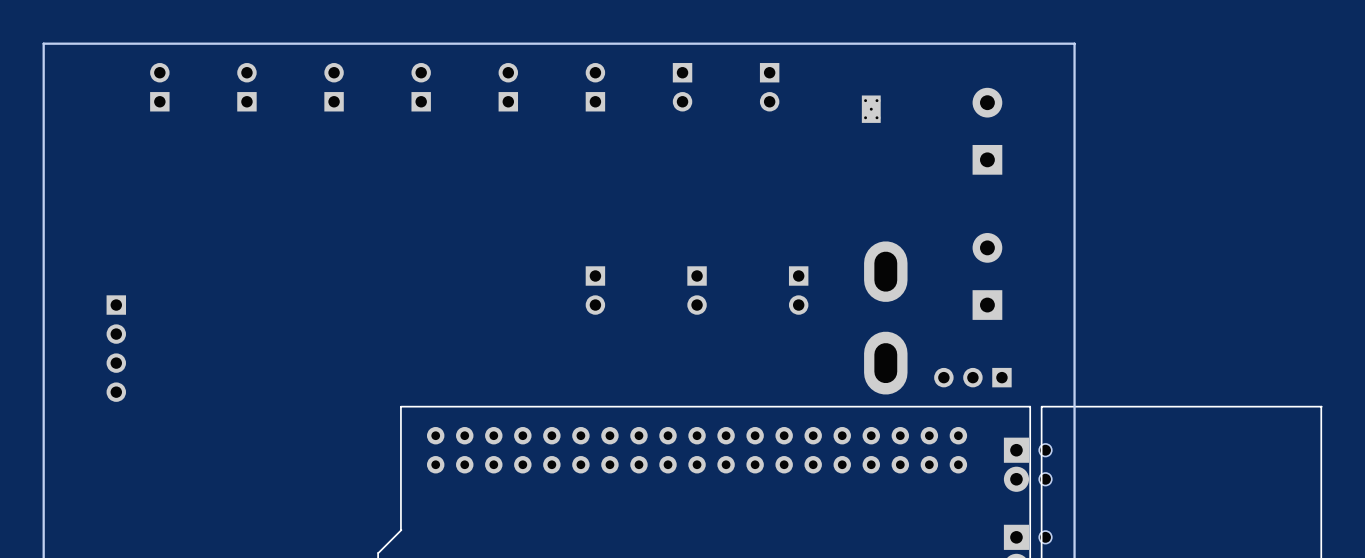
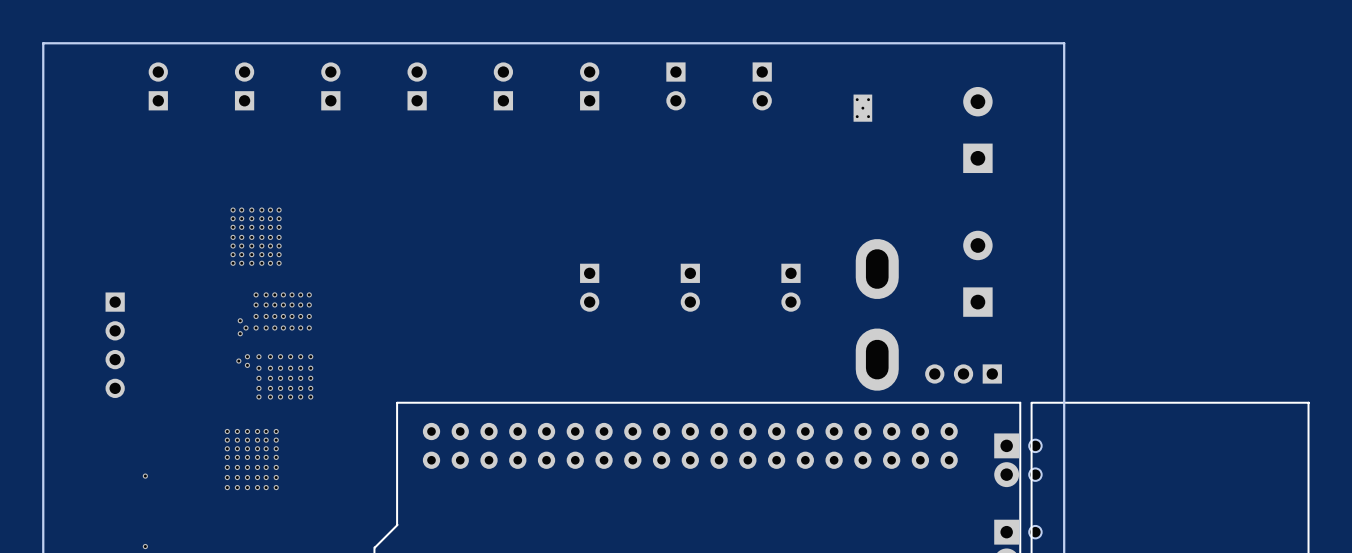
via: none -> (233, 210)
via: none -> (241, 210)
via: none -> (251, 210)
via: none -> (261, 210)
via: none -> (270, 210)
via: none -> (279, 210)
via: none -> (233, 218)
via: none -> (241, 218)
via: none -> (251, 218)
via: none -> (261, 218)
via: none -> (270, 218)
via: none -> (279, 218)
via: none -> (233, 227)
via: none -> (241, 227)
via: none -> (251, 227)
via: none -> (261, 227)
via: none -> (270, 227)
via: none -> (279, 227)
via: none -> (233, 237)
via: none -> (241, 237)
via: none -> (251, 237)
via: none -> (261, 237)
via: none -> (270, 237)
via: none -> (279, 237)
via: none -> (233, 246)
via: none -> (241, 246)
via: none -> (251, 246)
via: none -> (261, 246)
via: none -> (270, 246)
via: none -> (279, 246)
via: none -> (233, 254)
via: none -> (241, 254)
via: none -> (251, 254)
via: none -> (261, 254)
via: none -> (270, 254)
via: none -> (279, 254)
via: none -> (233, 263)
via: none -> (241, 263)
via: none -> (251, 263)
via: none -> (261, 263)
via: none -> (270, 263)
via: none -> (279, 263)
via: none -> (256, 294)
via: none -> (266, 294)
via: none -> (274, 294)
via: none -> (283, 294)
via: none -> (292, 294)
via: none -> (300, 294)
via: none -> (309, 294)
via: none -> (256, 304)
via: none -> (266, 304)
via: none -> (274, 304)
via: none -> (283, 304)
via: none -> (292, 304)
via: none -> (300, 304)
via: none -> (309, 304)
via: none -> (256, 316)
via: none -> (266, 316)
via: none -> (274, 316)
via: none -> (283, 316)
via: none -> (292, 316)
via: none -> (300, 316)
via: none -> (309, 316)
via: none -> (240, 320)
via: none -> (246, 327)
via: none -> (256, 327)
via: none -> (266, 327)
via: none -> (274, 327)
via: none -> (283, 327)
via: none -> (292, 327)
via: none -> (300, 327)
via: none -> (309, 327)
via: none -> (240, 333)
via: none -> (247, 356)
via: none -> (258, 356)
via: none -> (270, 356)
via: none -> (280, 356)
via: none -> (290, 356)
via: none -> (300, 356)
via: none -> (310, 356)
via: none -> (238, 361)
via: none -> (247, 365)
via: none -> (258, 368)
via: none -> (270, 368)
via: none -> (280, 368)
via: none -> (290, 368)
via: none -> (300, 368)
via: none -> (310, 368)
via: none -> (258, 378)
via: none -> (270, 378)
via: none -> (280, 378)
via: none -> (290, 378)
via: none -> (300, 378)
via: none -> (310, 378)
via: none -> (258, 388)
via: none -> (270, 388)
via: none -> (280, 388)
via: none -> (290, 388)
via: none -> (300, 388)
via: none -> (310, 388)
via: none -> (258, 396)
via: none -> (270, 396)
via: none -> (280, 396)
via: none -> (290, 396)
via: none -> (300, 396)
via: none -> (310, 396)
via: none -> (227, 431)
via: none -> (237, 431)
via: none -> (247, 431)
via: none -> (257, 431)
via: none -> (266, 431)
via: none -> (276, 431)
via: none -> (227, 440)
via: none -> (237, 440)
via: none -> (247, 440)
via: none -> (257, 440)
via: none -> (266, 440)
via: none -> (276, 440)
via: none -> (227, 448)
via: none -> (237, 448)
via: none -> (247, 448)
via: none -> (257, 448)
via: none -> (266, 448)
via: none -> (276, 448)
via: none -> (227, 457)
via: none -> (237, 457)
via: none -> (247, 457)
via: none -> (257, 457)
via: none -> (266, 457)
via: none -> (276, 457)
via: none -> (227, 467)
via: none -> (237, 467)
via: none -> (247, 467)
via: none -> (257, 467)
via: none -> (266, 467)
via: none -> (276, 467)
via: none -> (145, 476)
via: none -> (227, 477)
via: none -> (237, 477)
via: none -> (247, 477)
via: none -> (257, 477)
via: none -> (266, 477)
via: none -> (276, 477)
via: none -> (227, 487)
via: none -> (237, 487)
via: none -> (247, 487)
via: none -> (257, 487)
via: none -> (266, 487)
via: none -> (276, 487)
via: none -> (145, 546)

